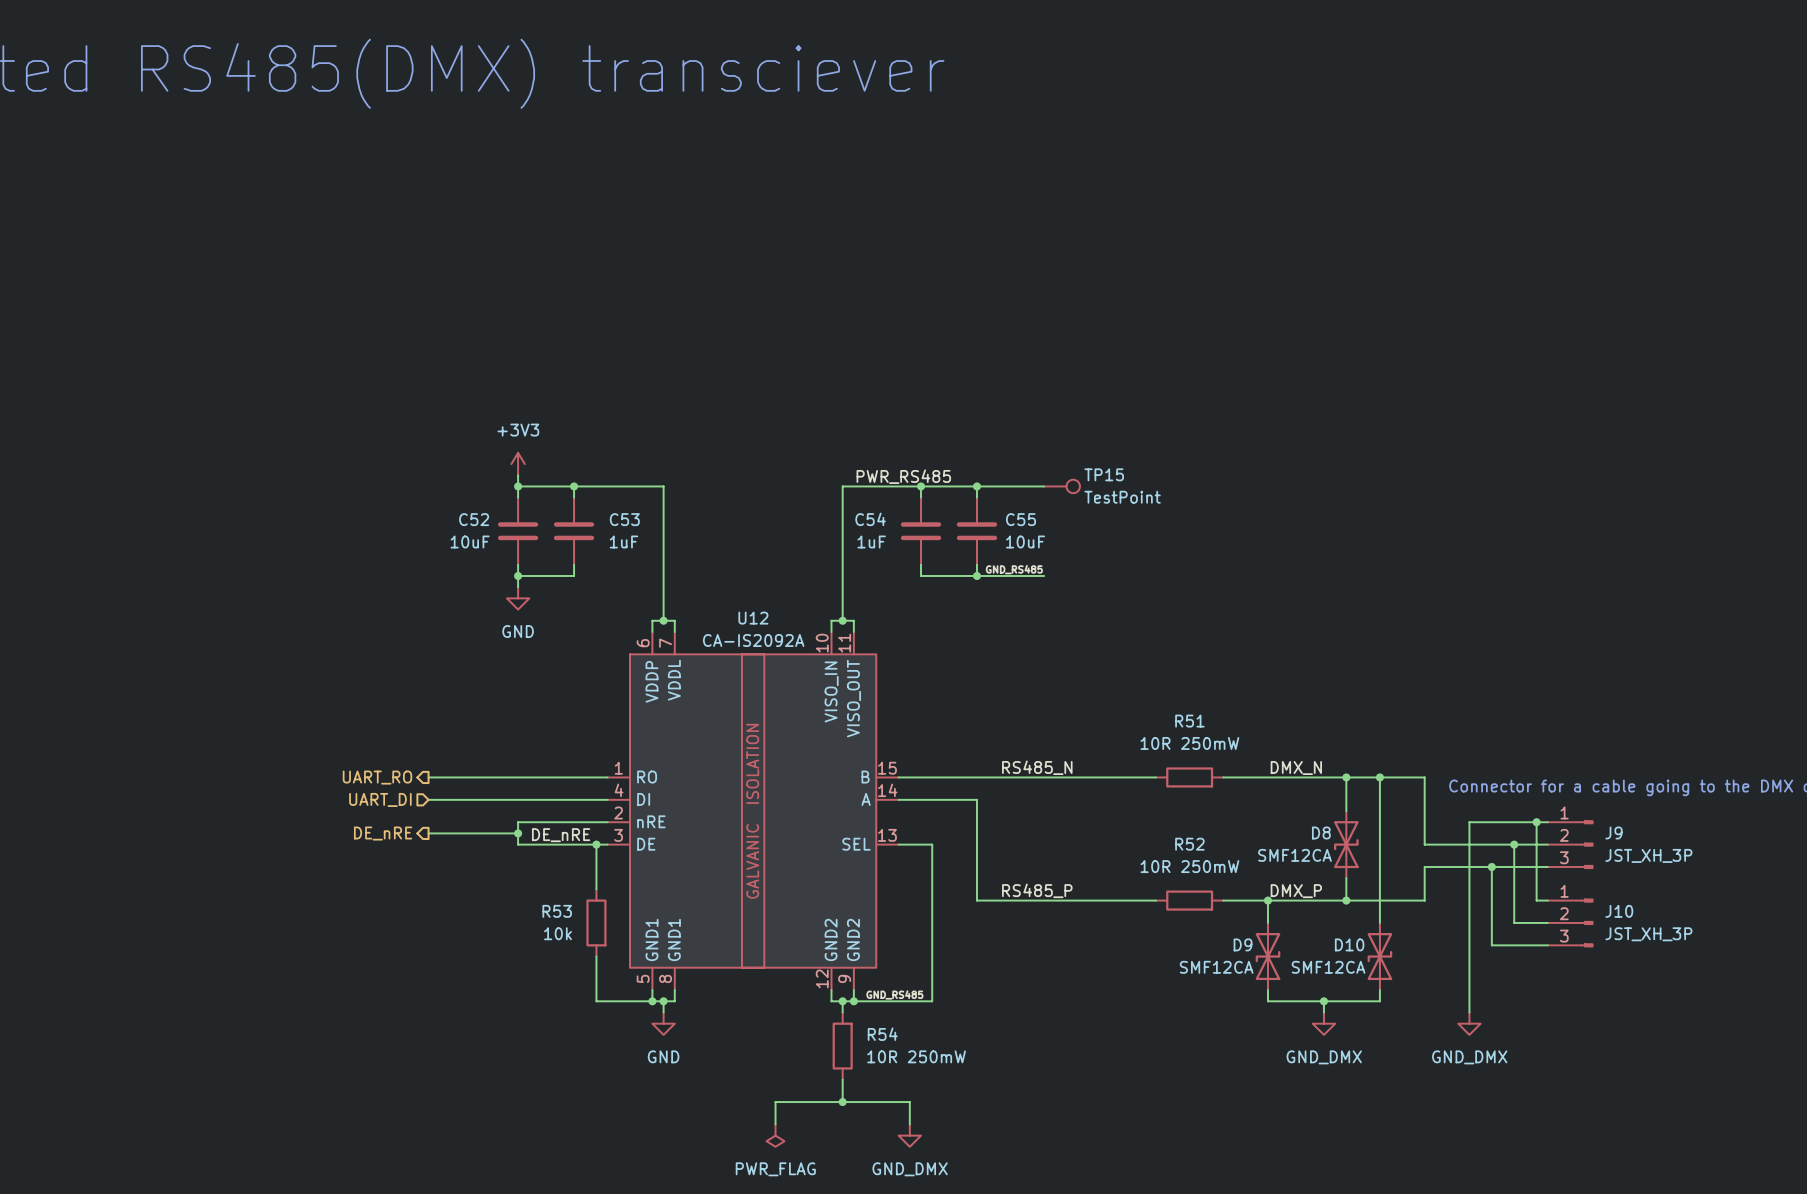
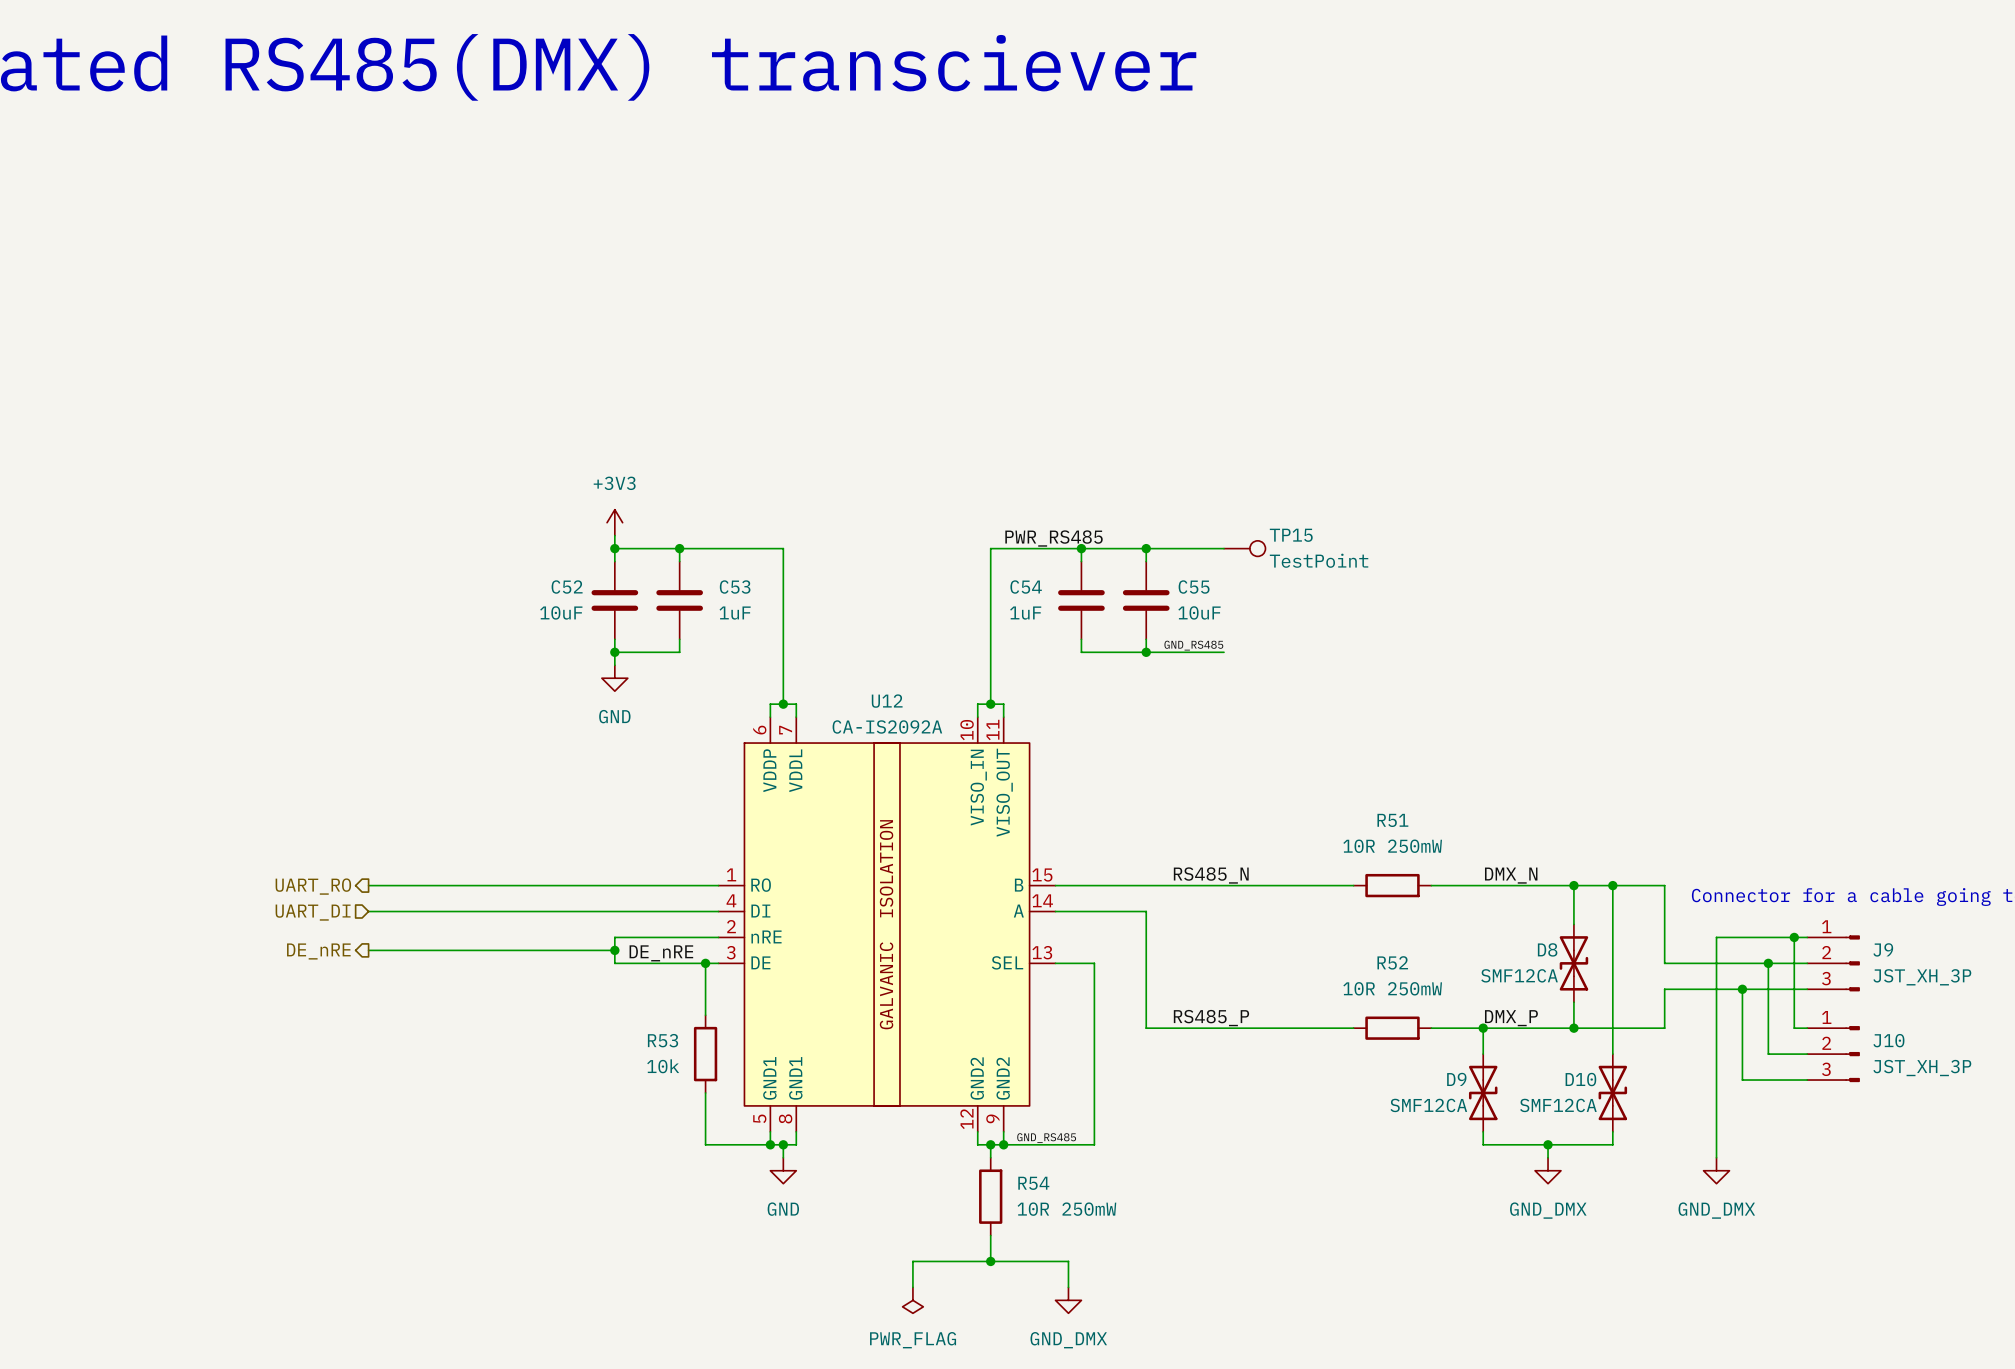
wire: none -> (368, 885) (511, 885)
hierarchical label position: UART_RO (377, 777) -> UART_RO (313, 886)
wire: none -> (368, 911) (511, 911)
hierarchical label position: UART_DI (380, 799) -> UART_DI (313, 912)
wire: none -> (368, 950) (511, 950)
hierarchical label position: DE_nRE (383, 833) -> DE_nRE (318, 951)

